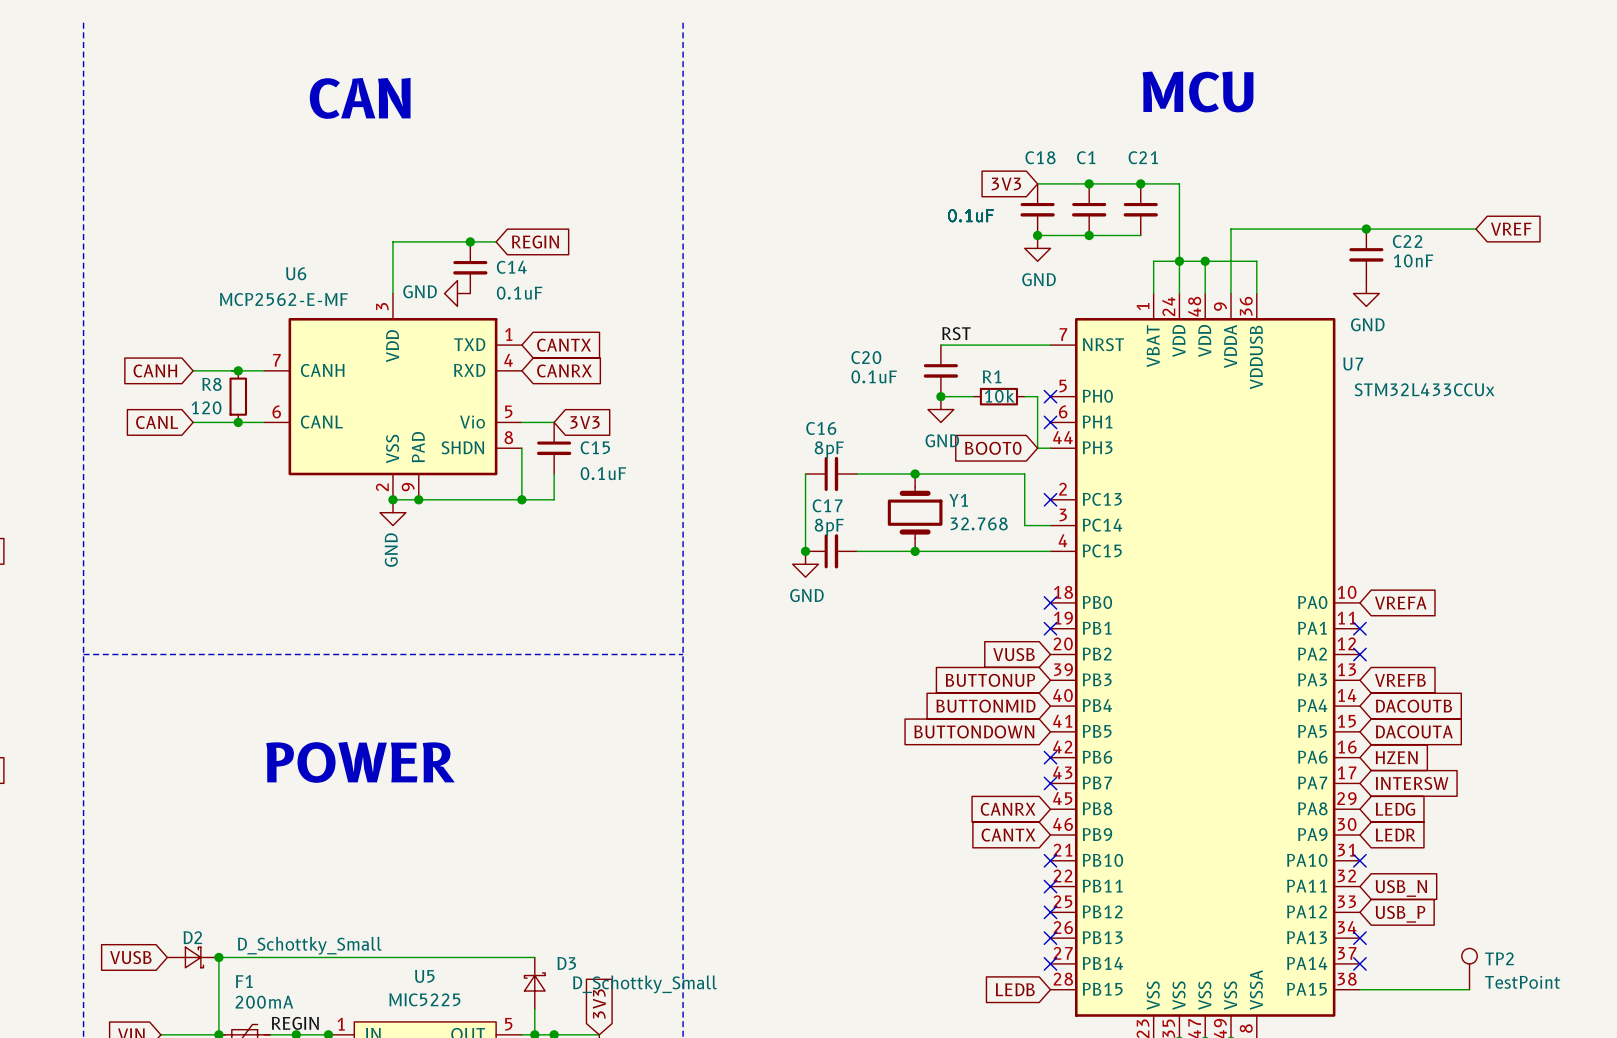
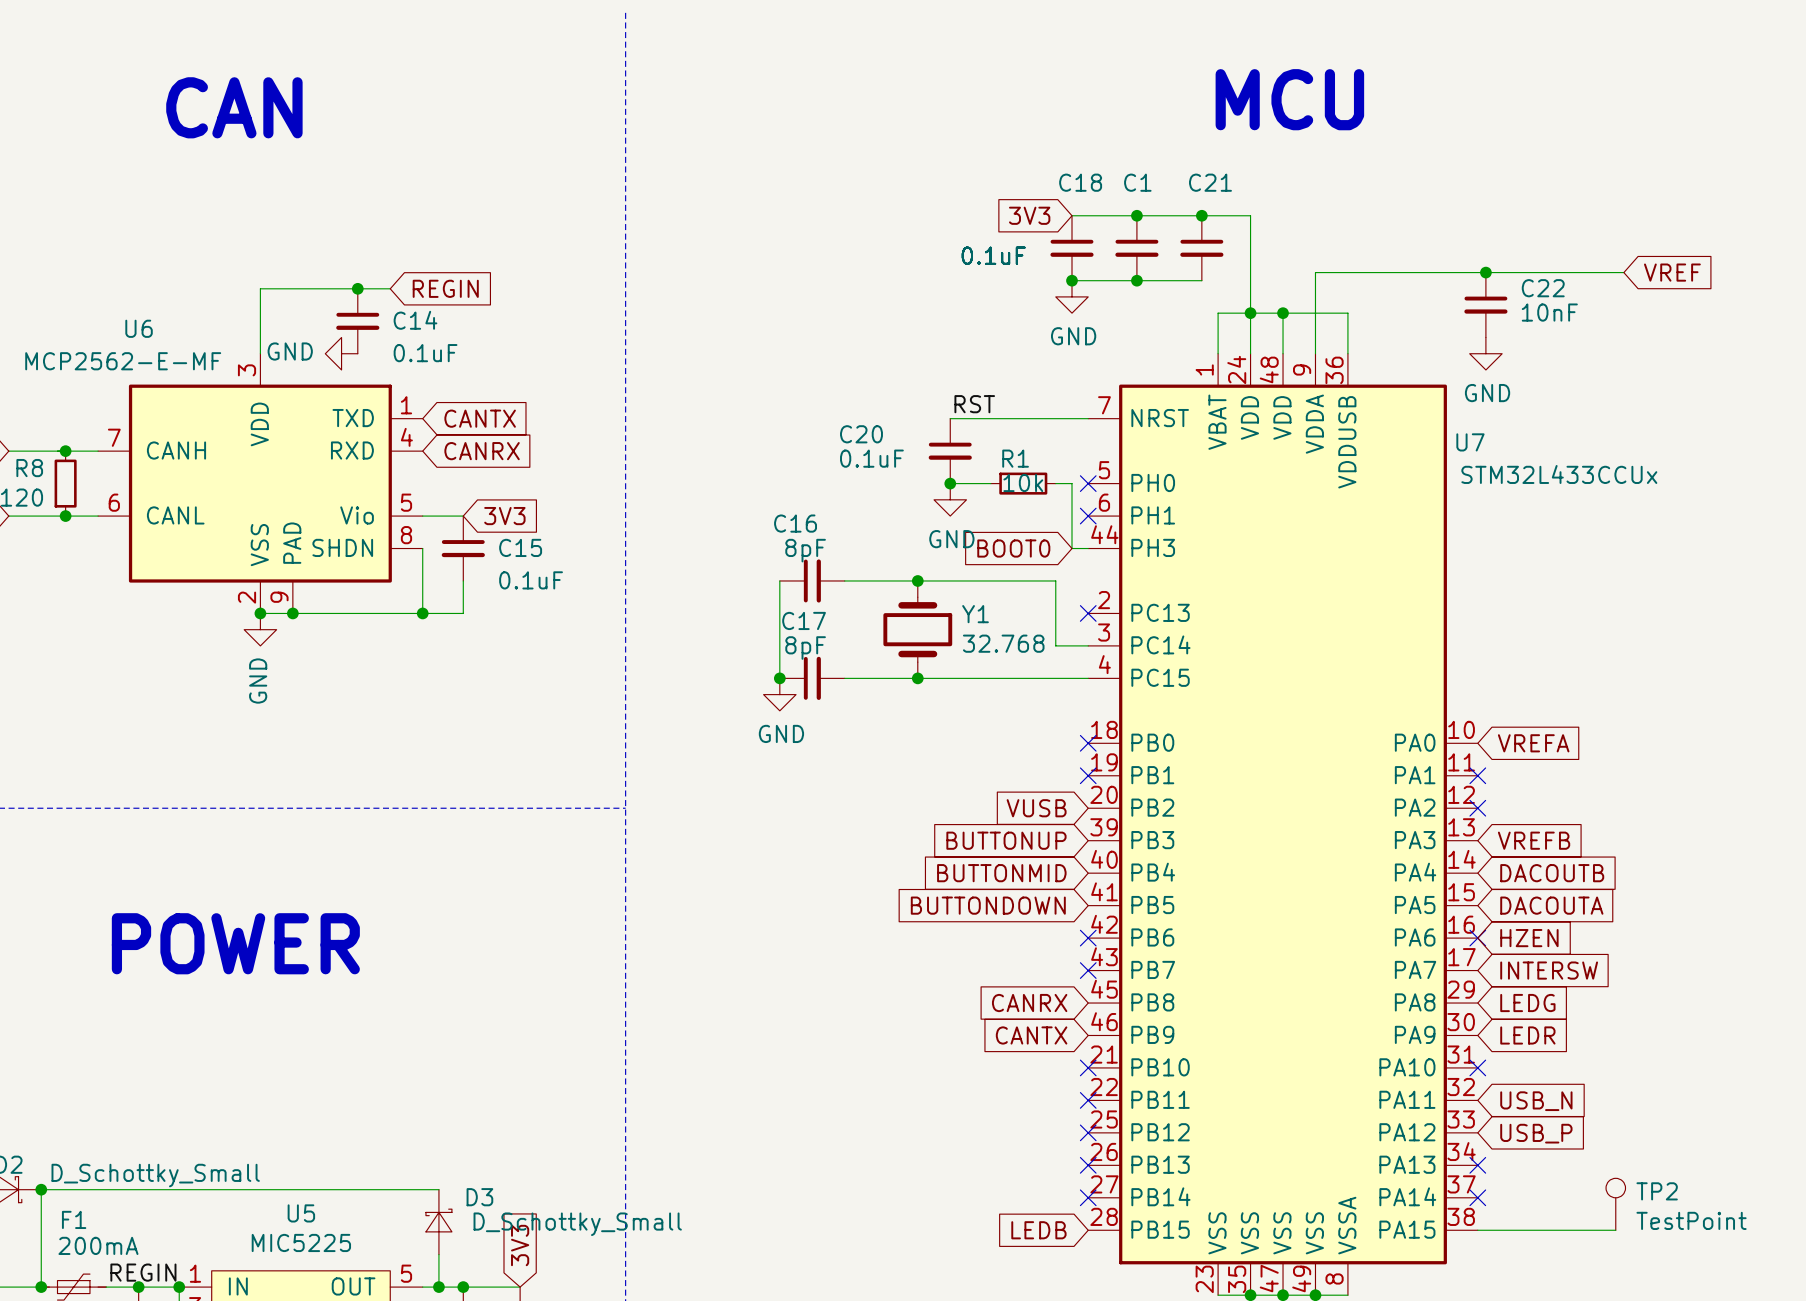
no-connect mark: none -> (1477, 938)

